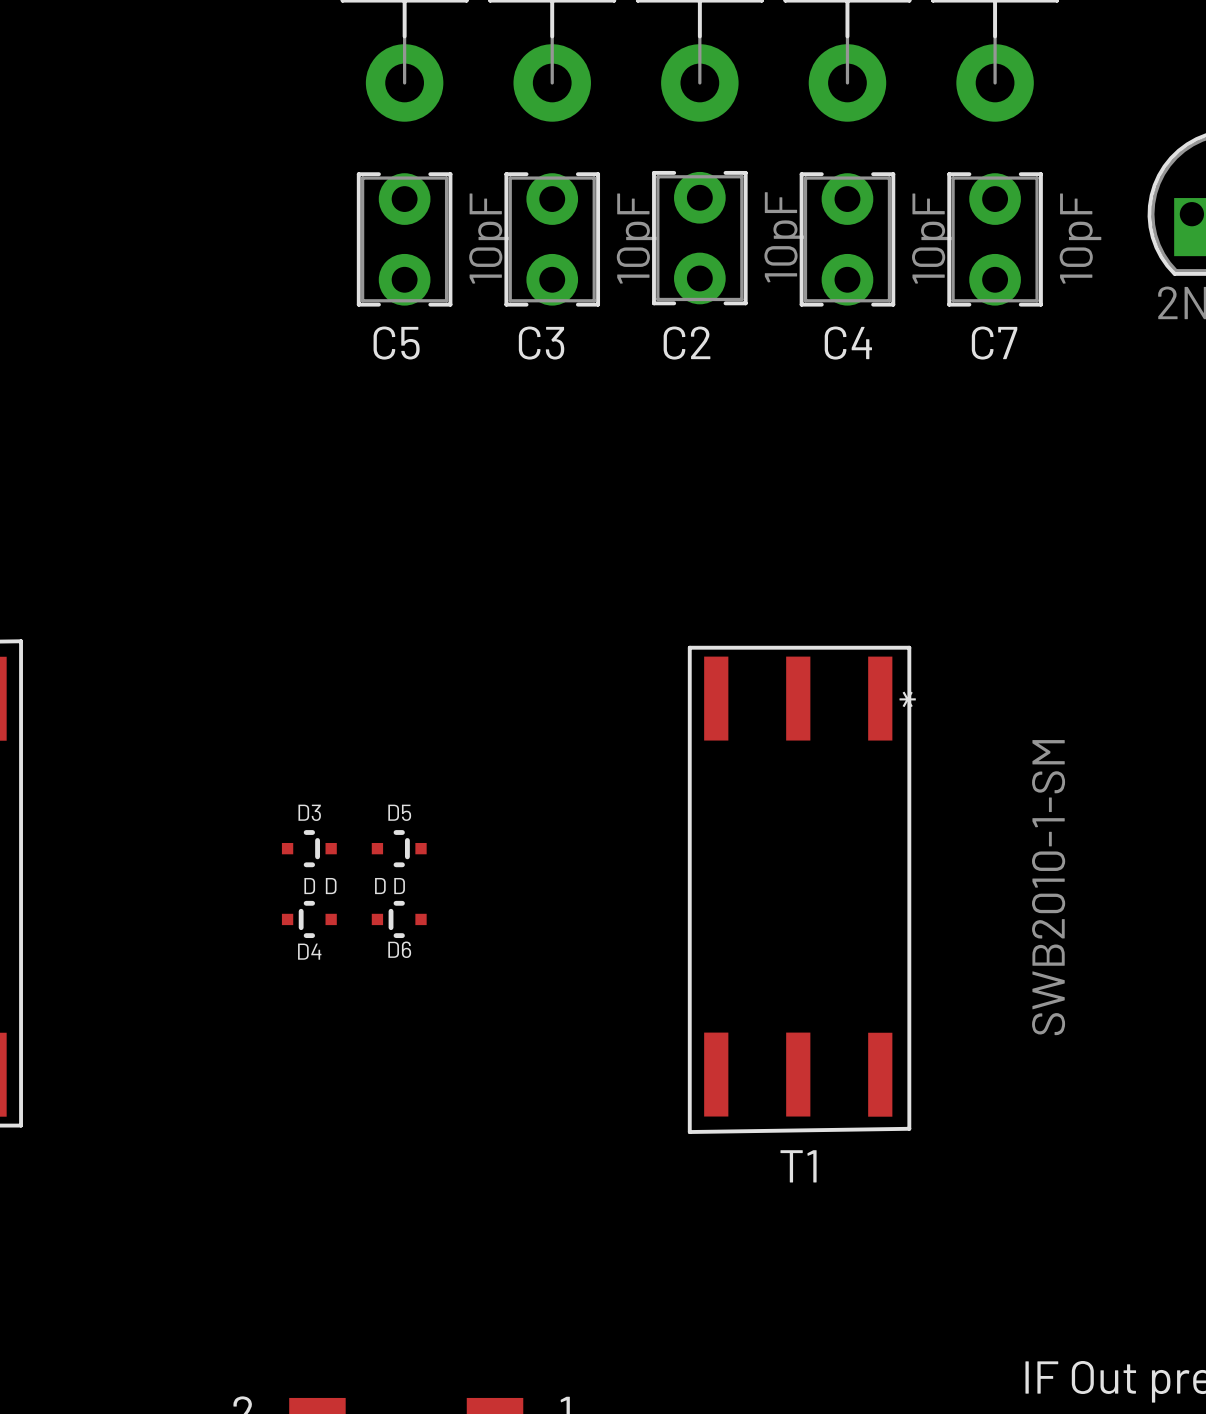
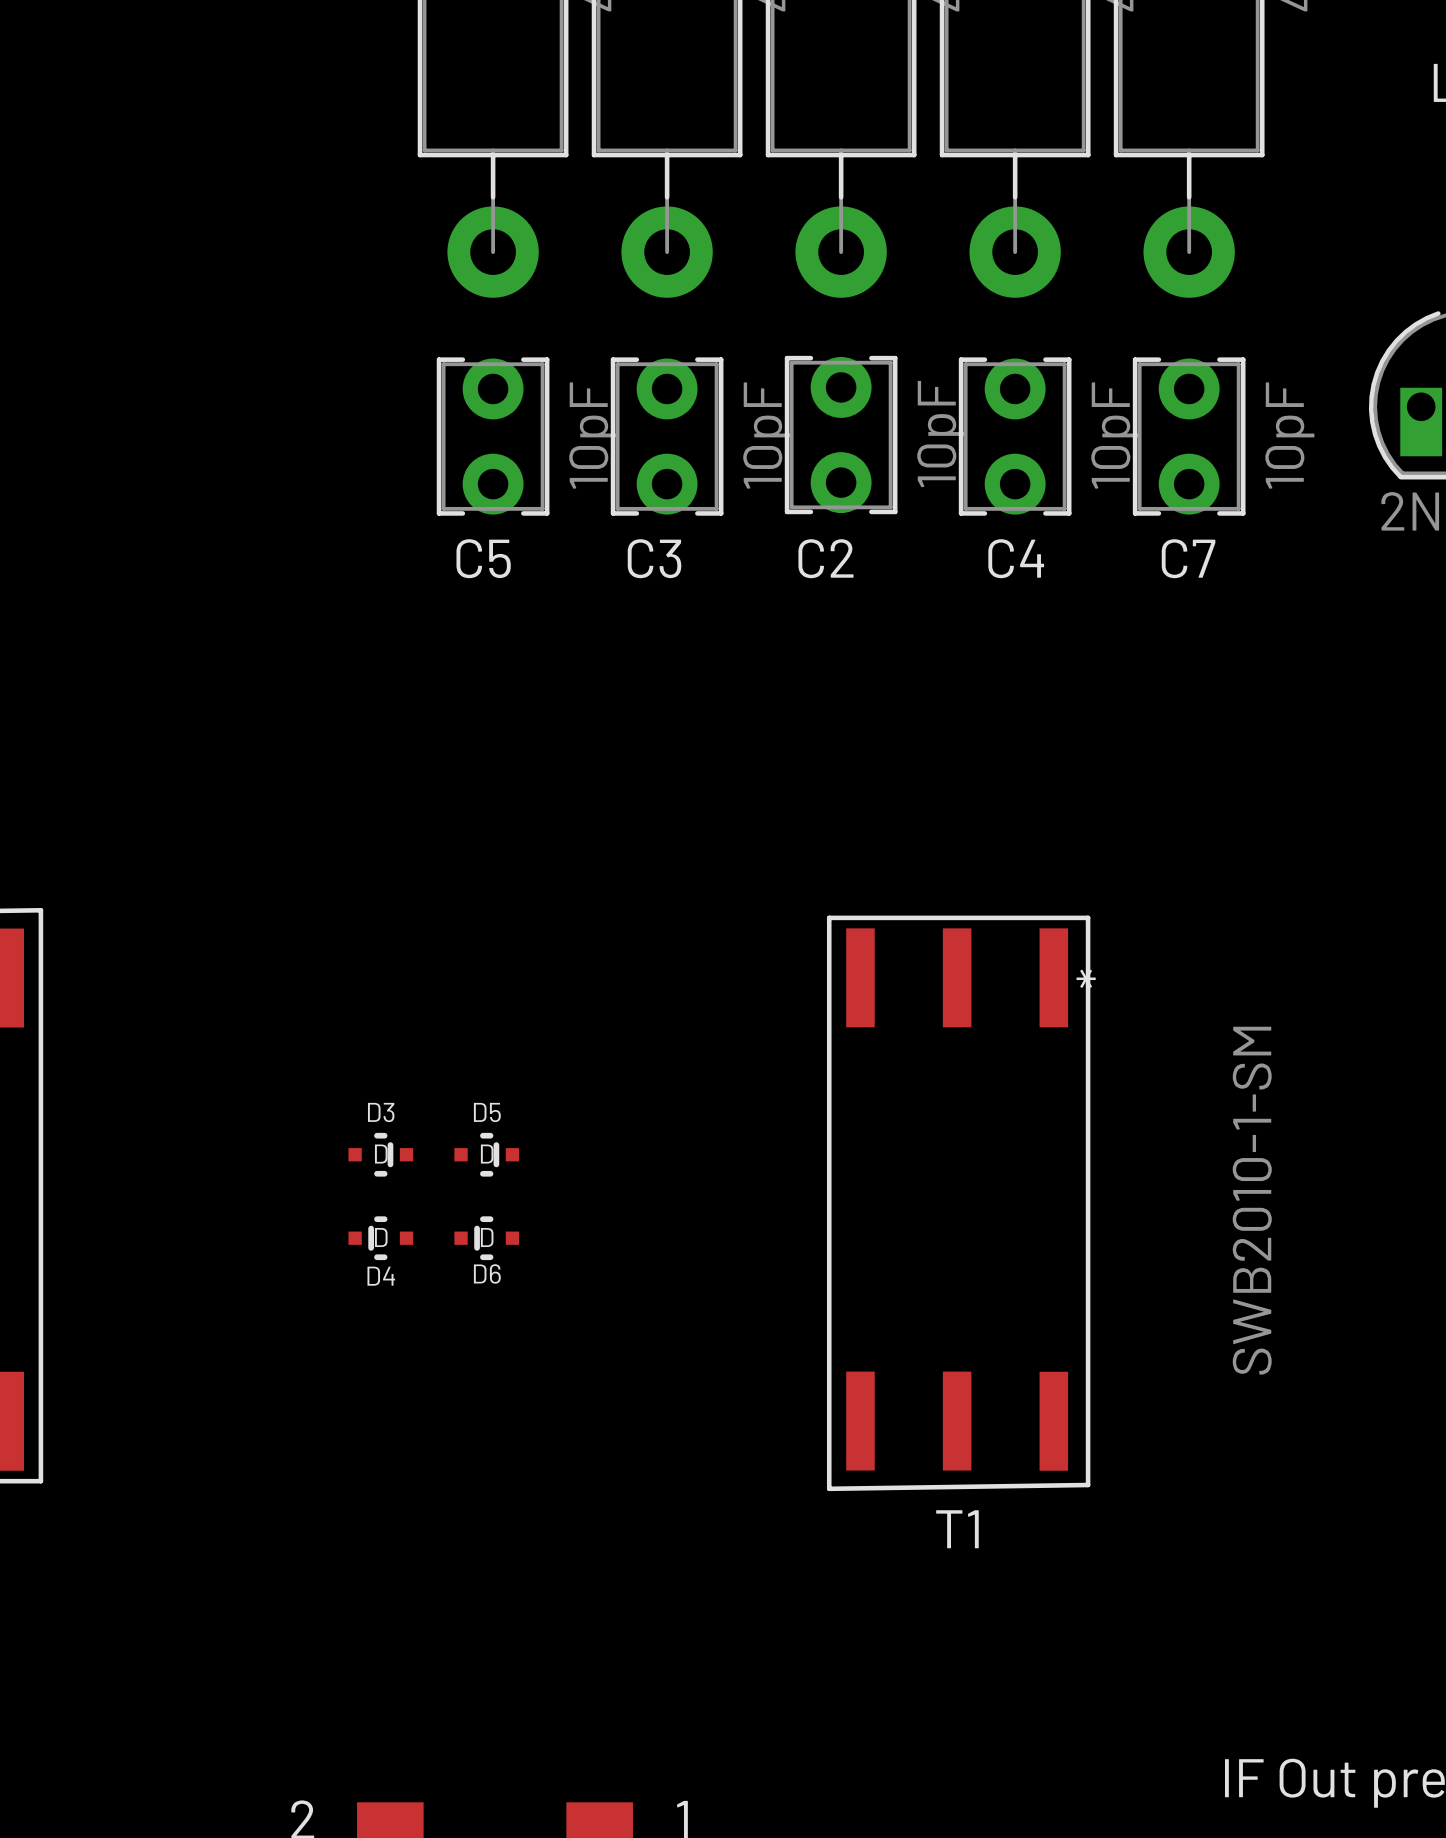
D4 value position: D (309, 886) -> D (381, 1237)
D3 value position: D (331, 886) -> D (381, 1154)
D6 value position: D (380, 886) -> D (487, 1237)
D5 value position: D (399, 886) -> D (487, 1154)

